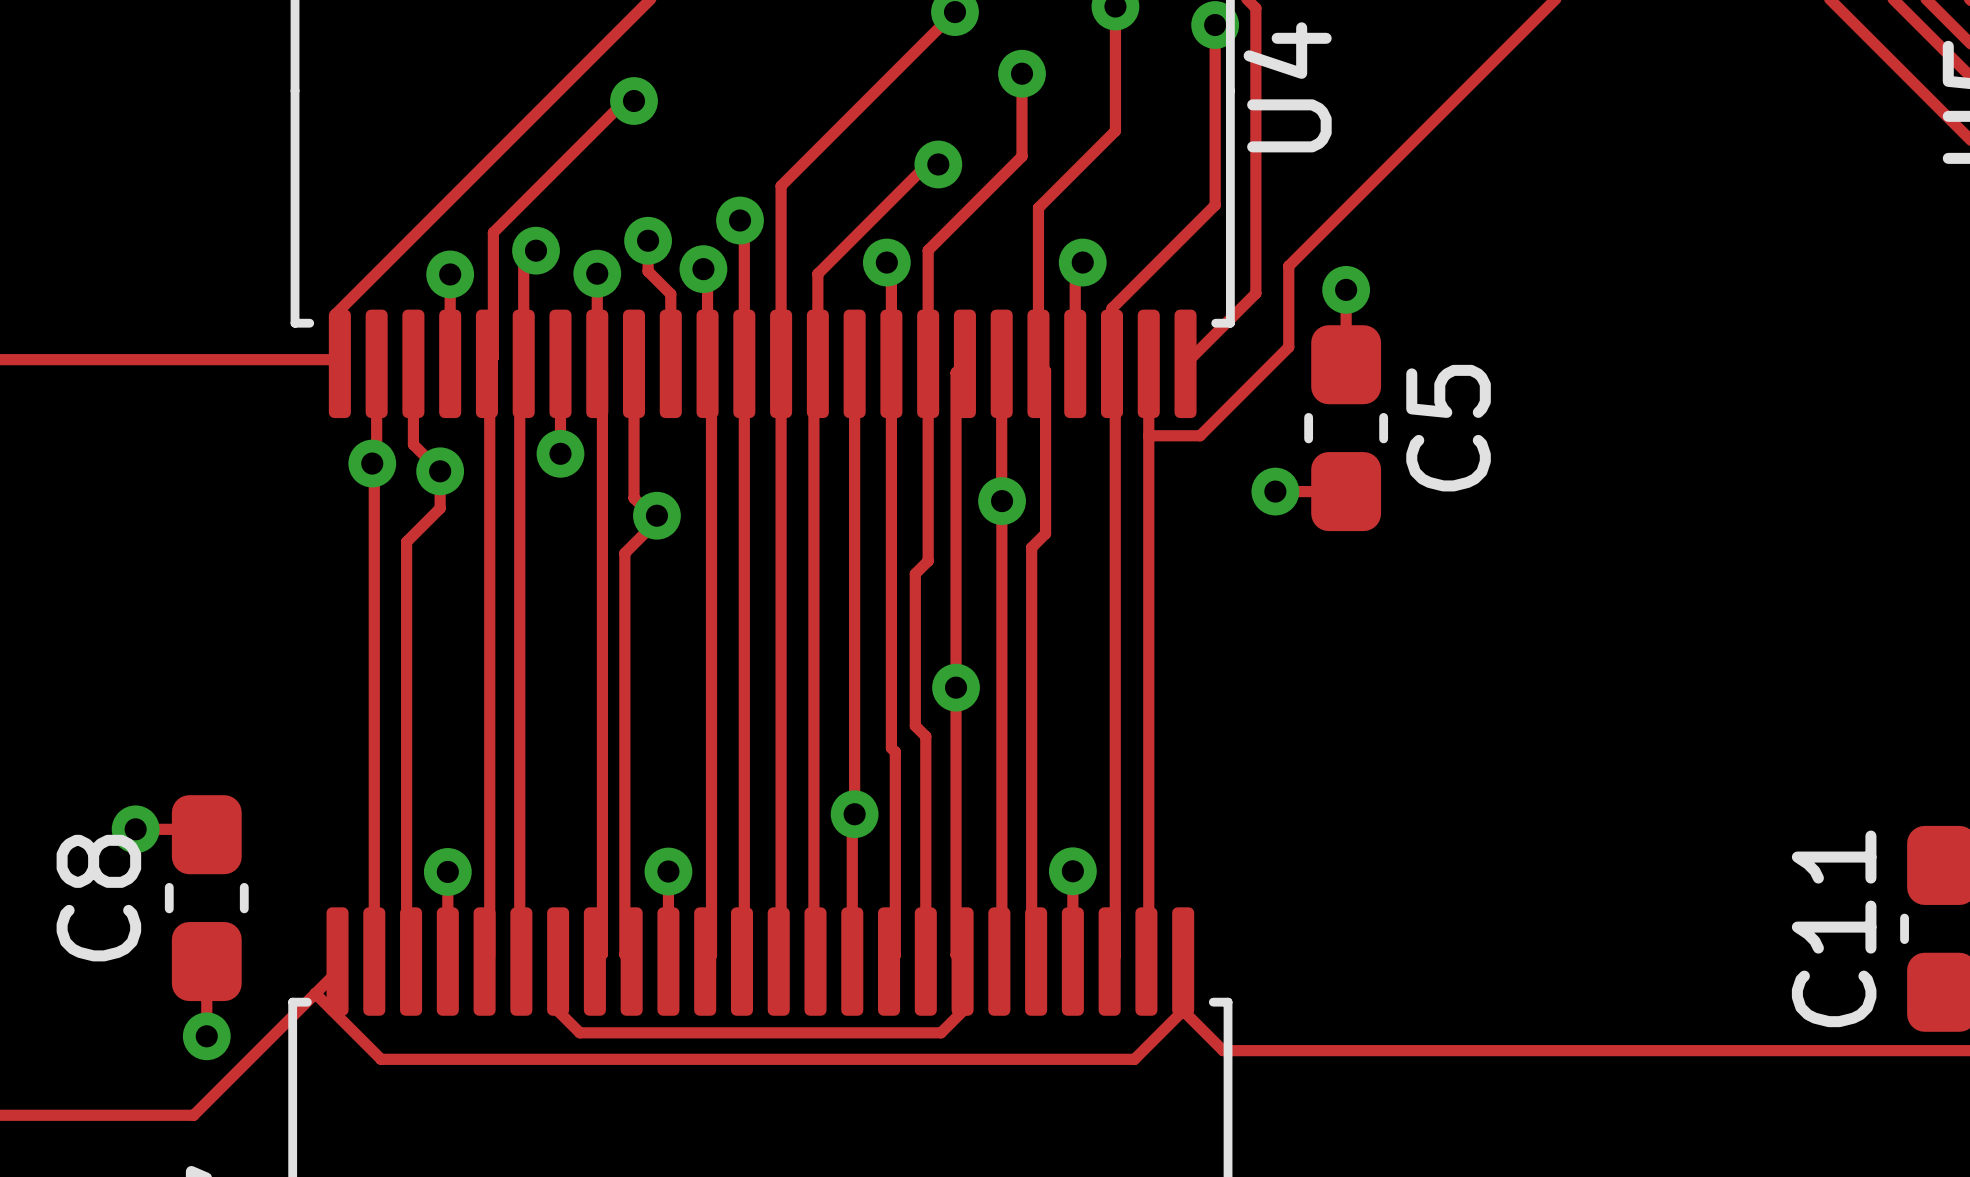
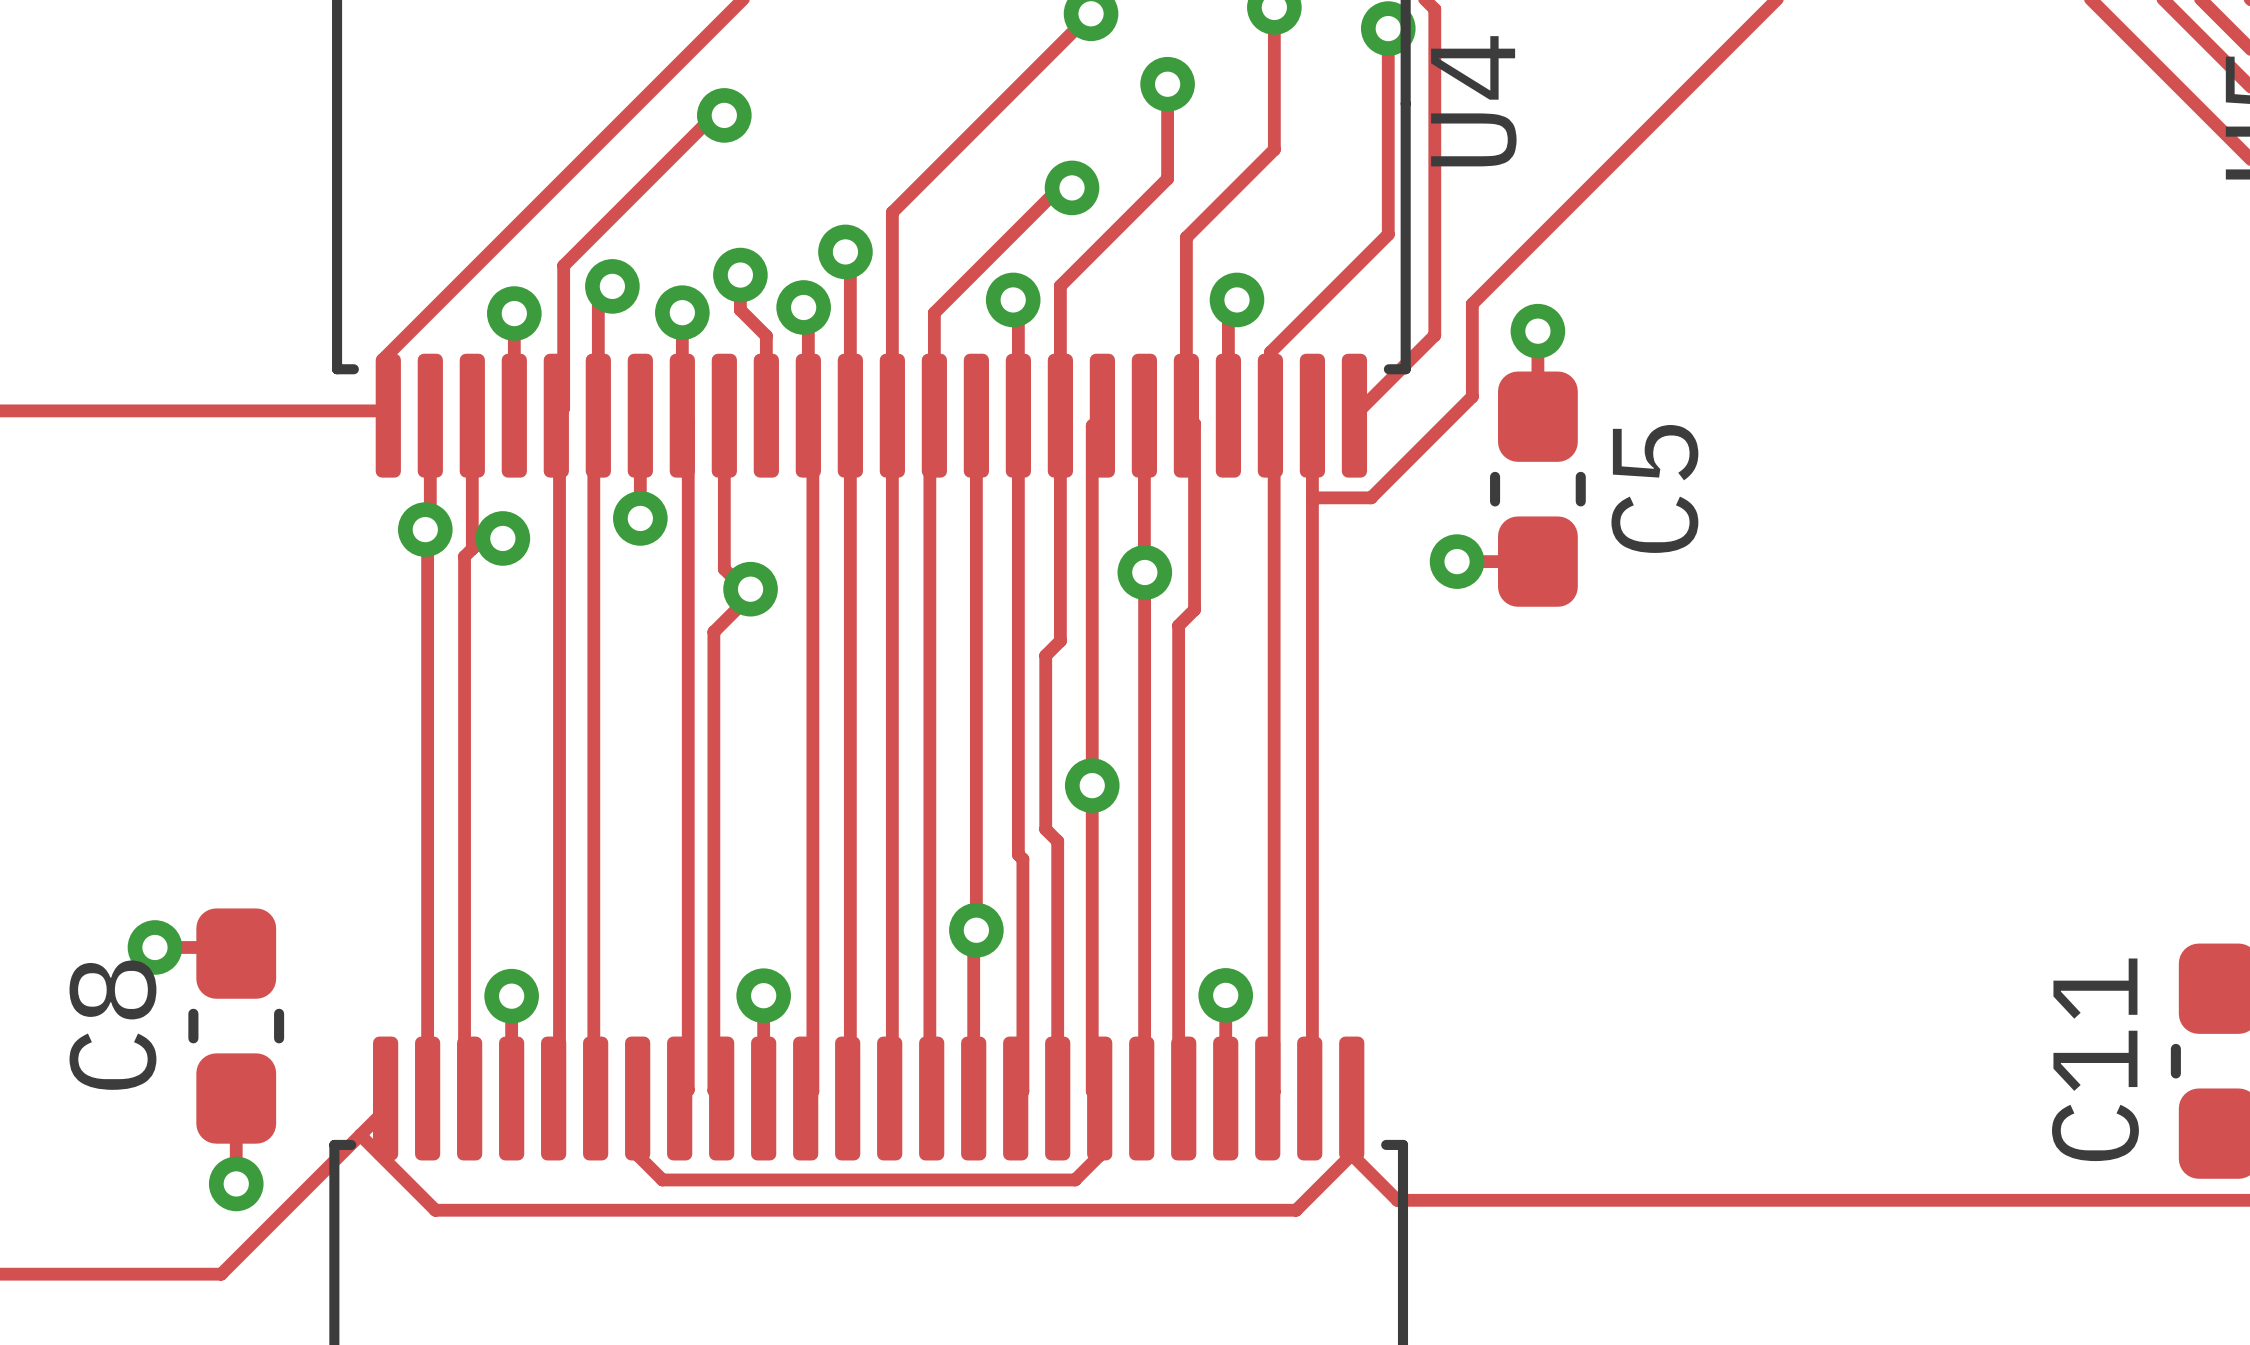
track: (413, 444) (440, 471) (440, 508) (406, 541) -> (502, 538) (482, 538) (464, 556) (464, 619)
track: none -> (472, 507) (472, 548)

